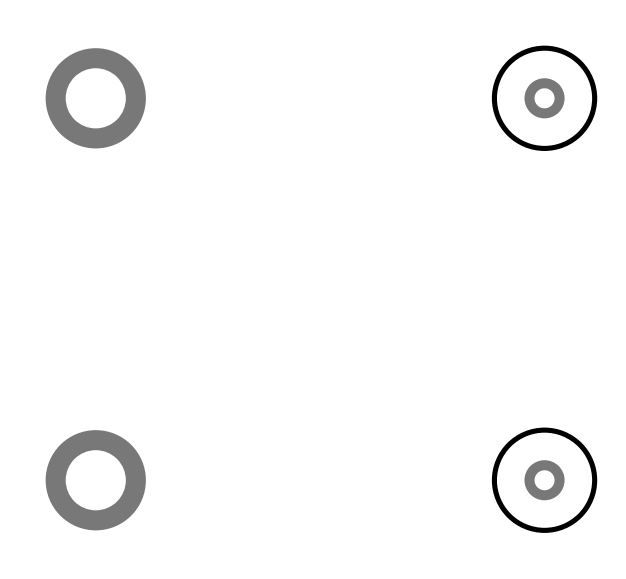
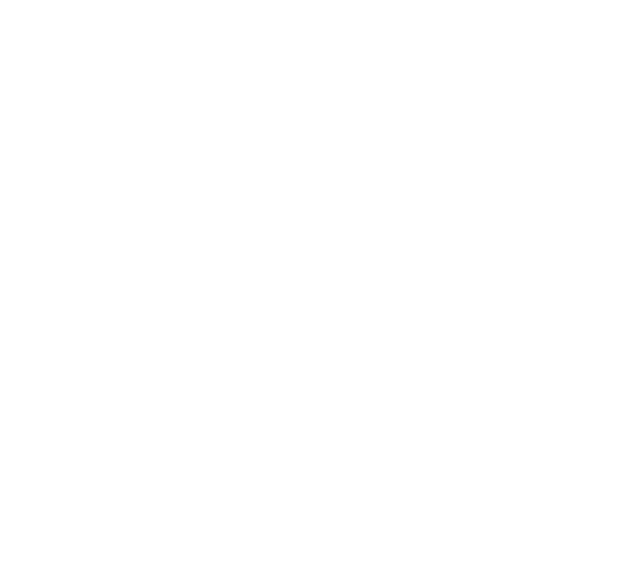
round board edge: [491, 45, 598, 151] -> none
via: (95, 98) -> none
via: (544, 98) -> none
round board edge: [491, 427, 598, 533] -> none
via: (95, 480) -> none
via: (544, 480) -> none

